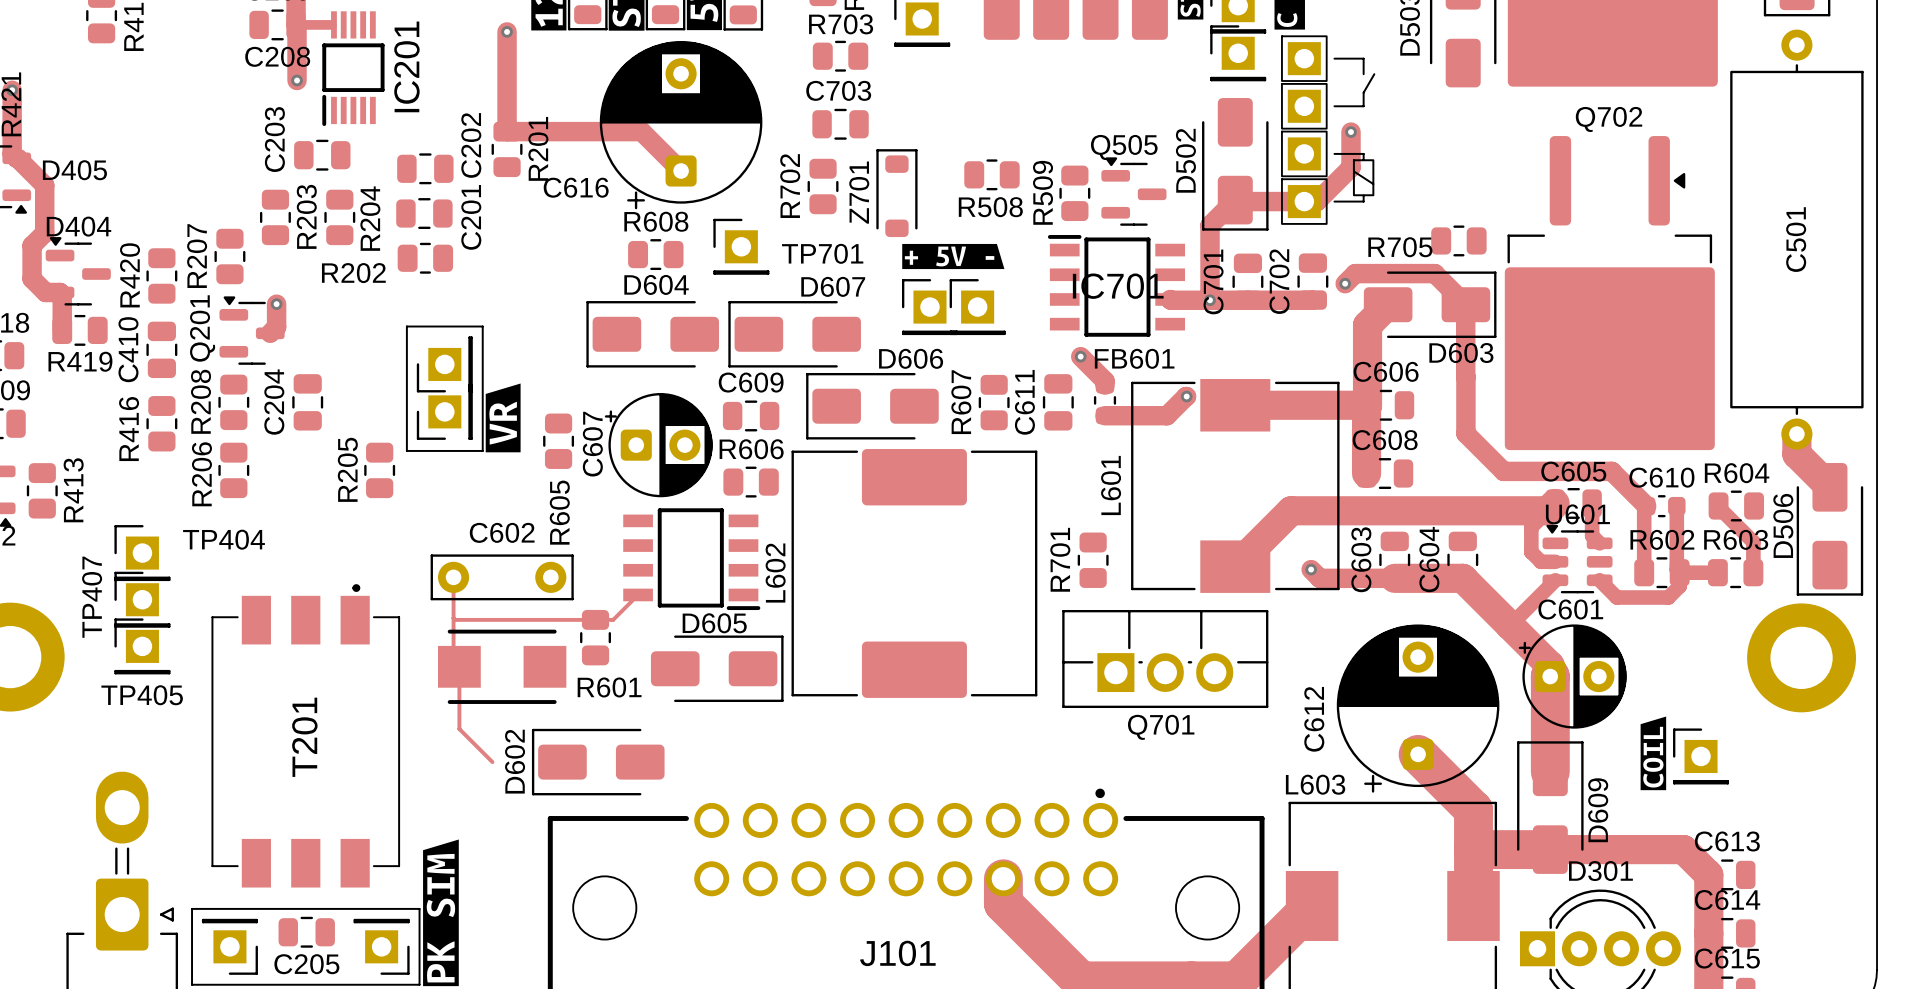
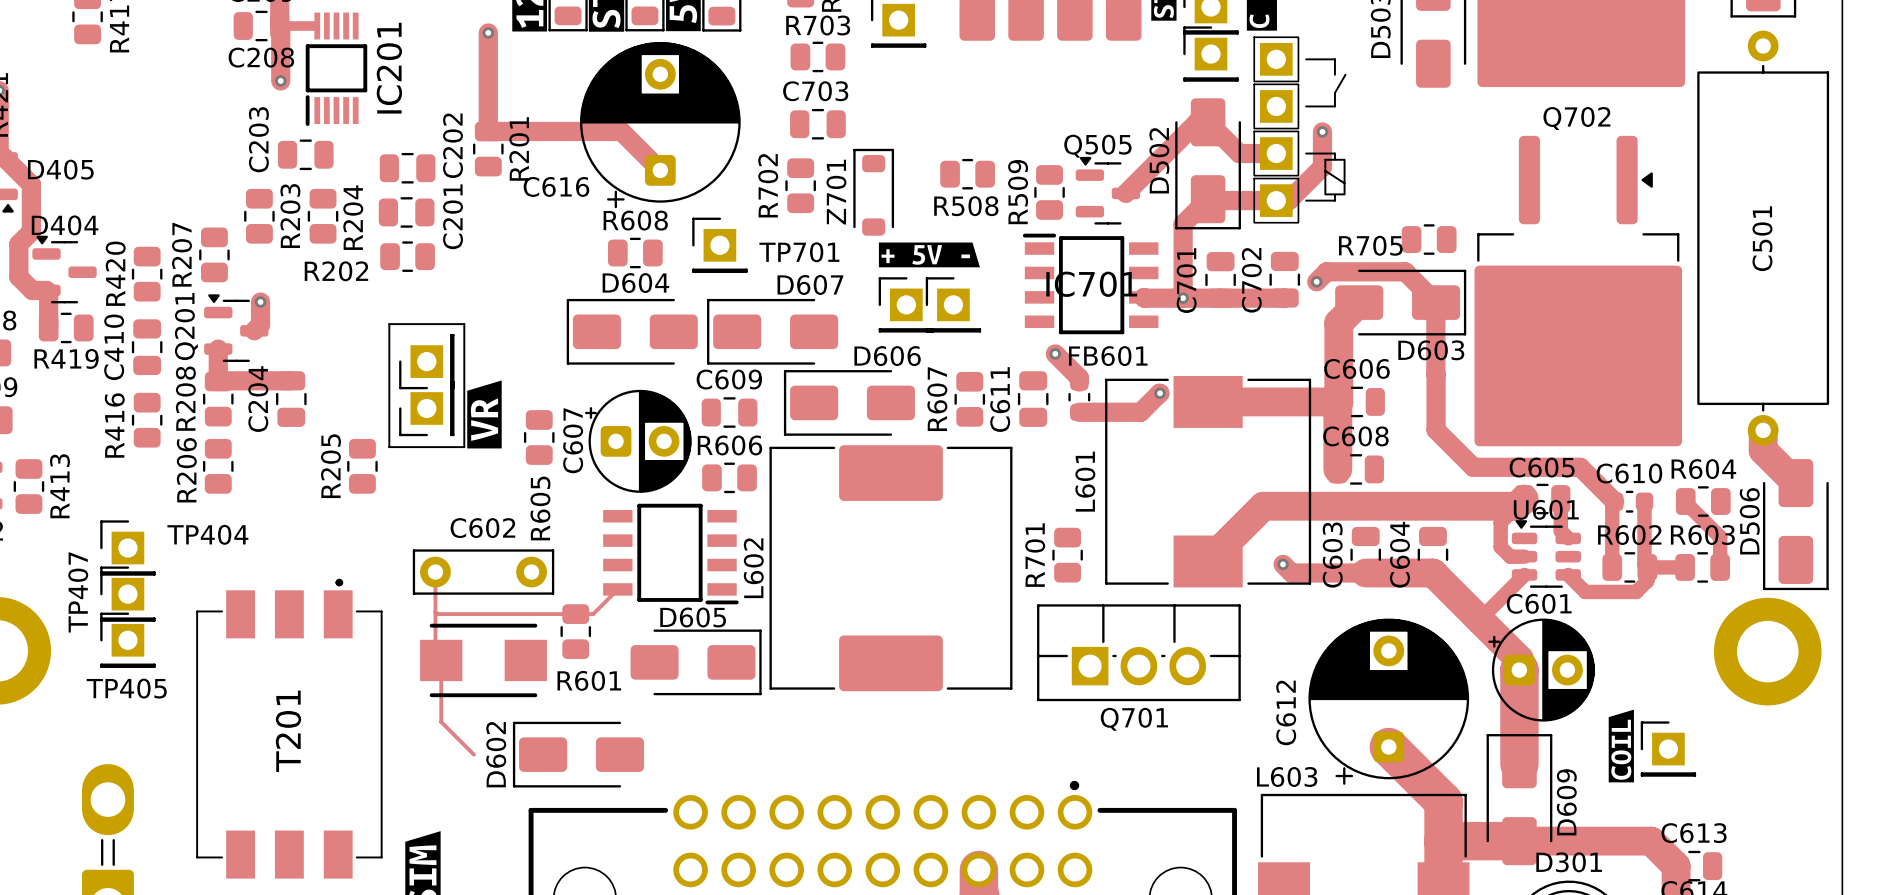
track: none -> (1276, 153) (1239, 153) (1208, 122) (1197, 122) (1125, 193)
track: none -> (218, 349) (218, 381) (291, 380)

